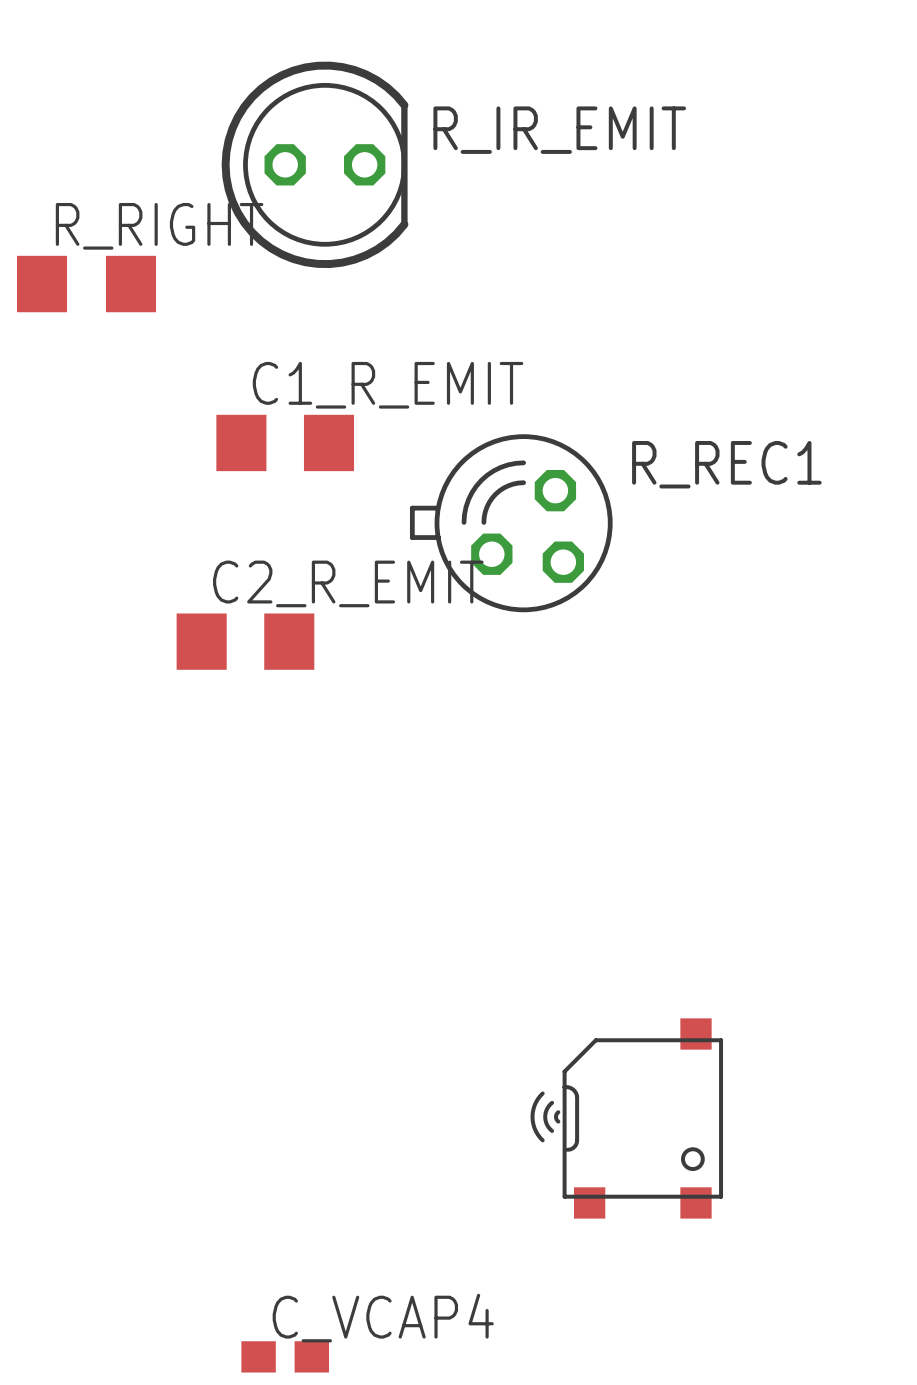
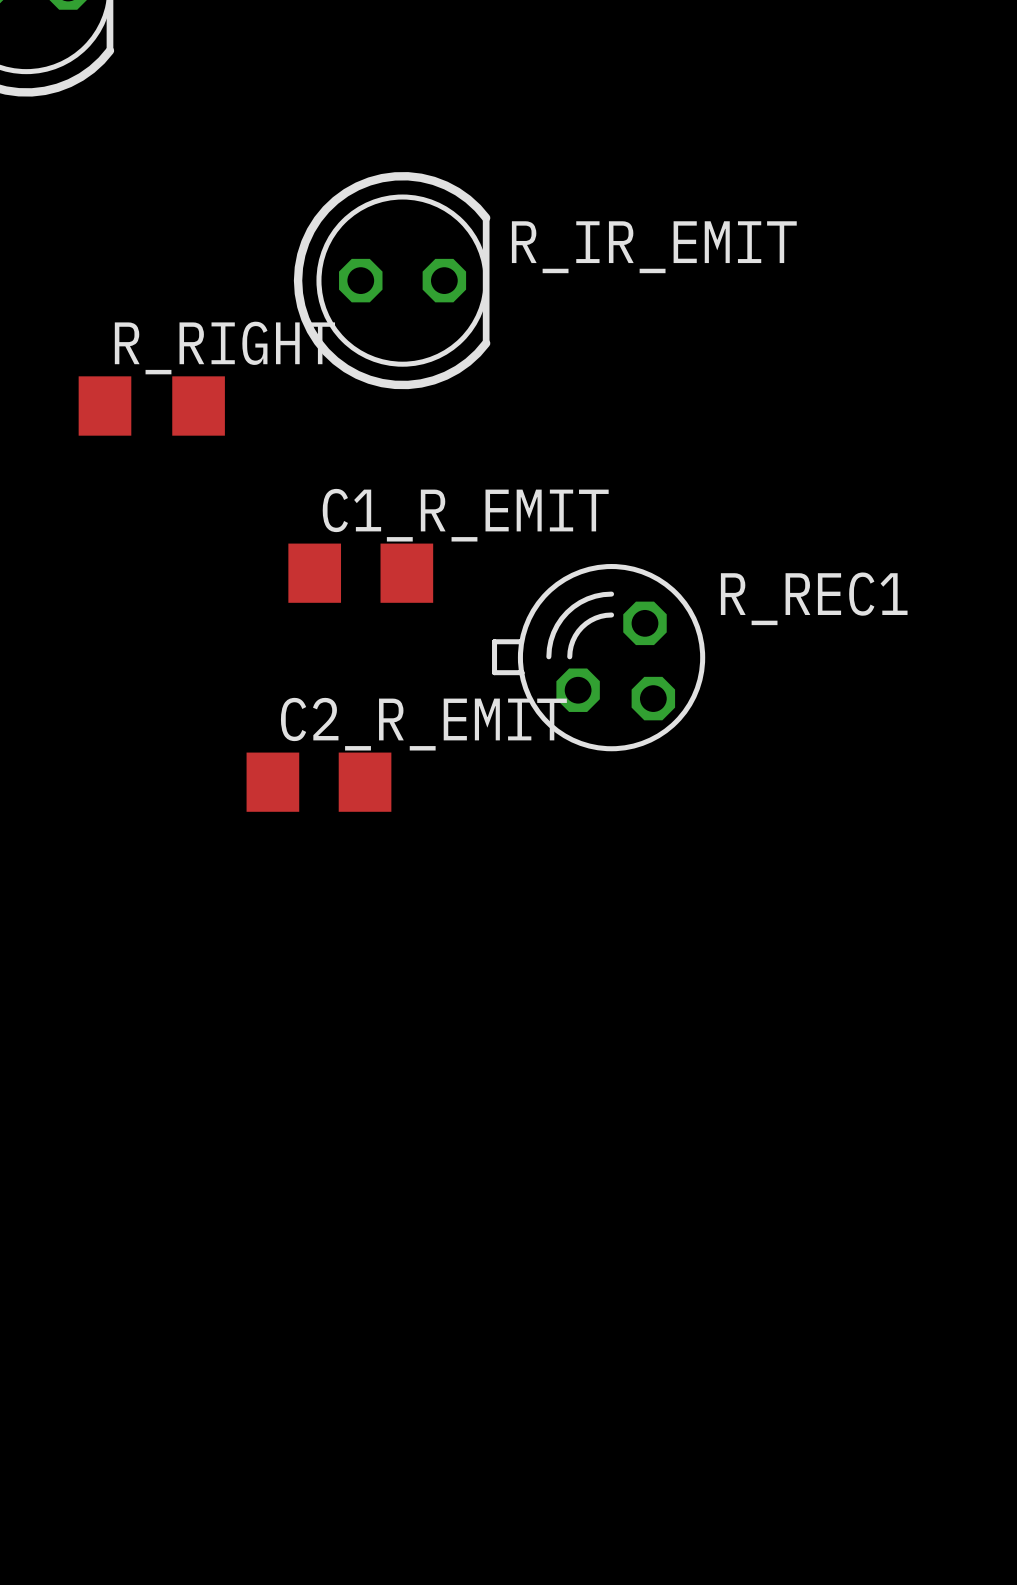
part: (626, 1118) -> none
C_VCAP4: (285, 1356) -> none

